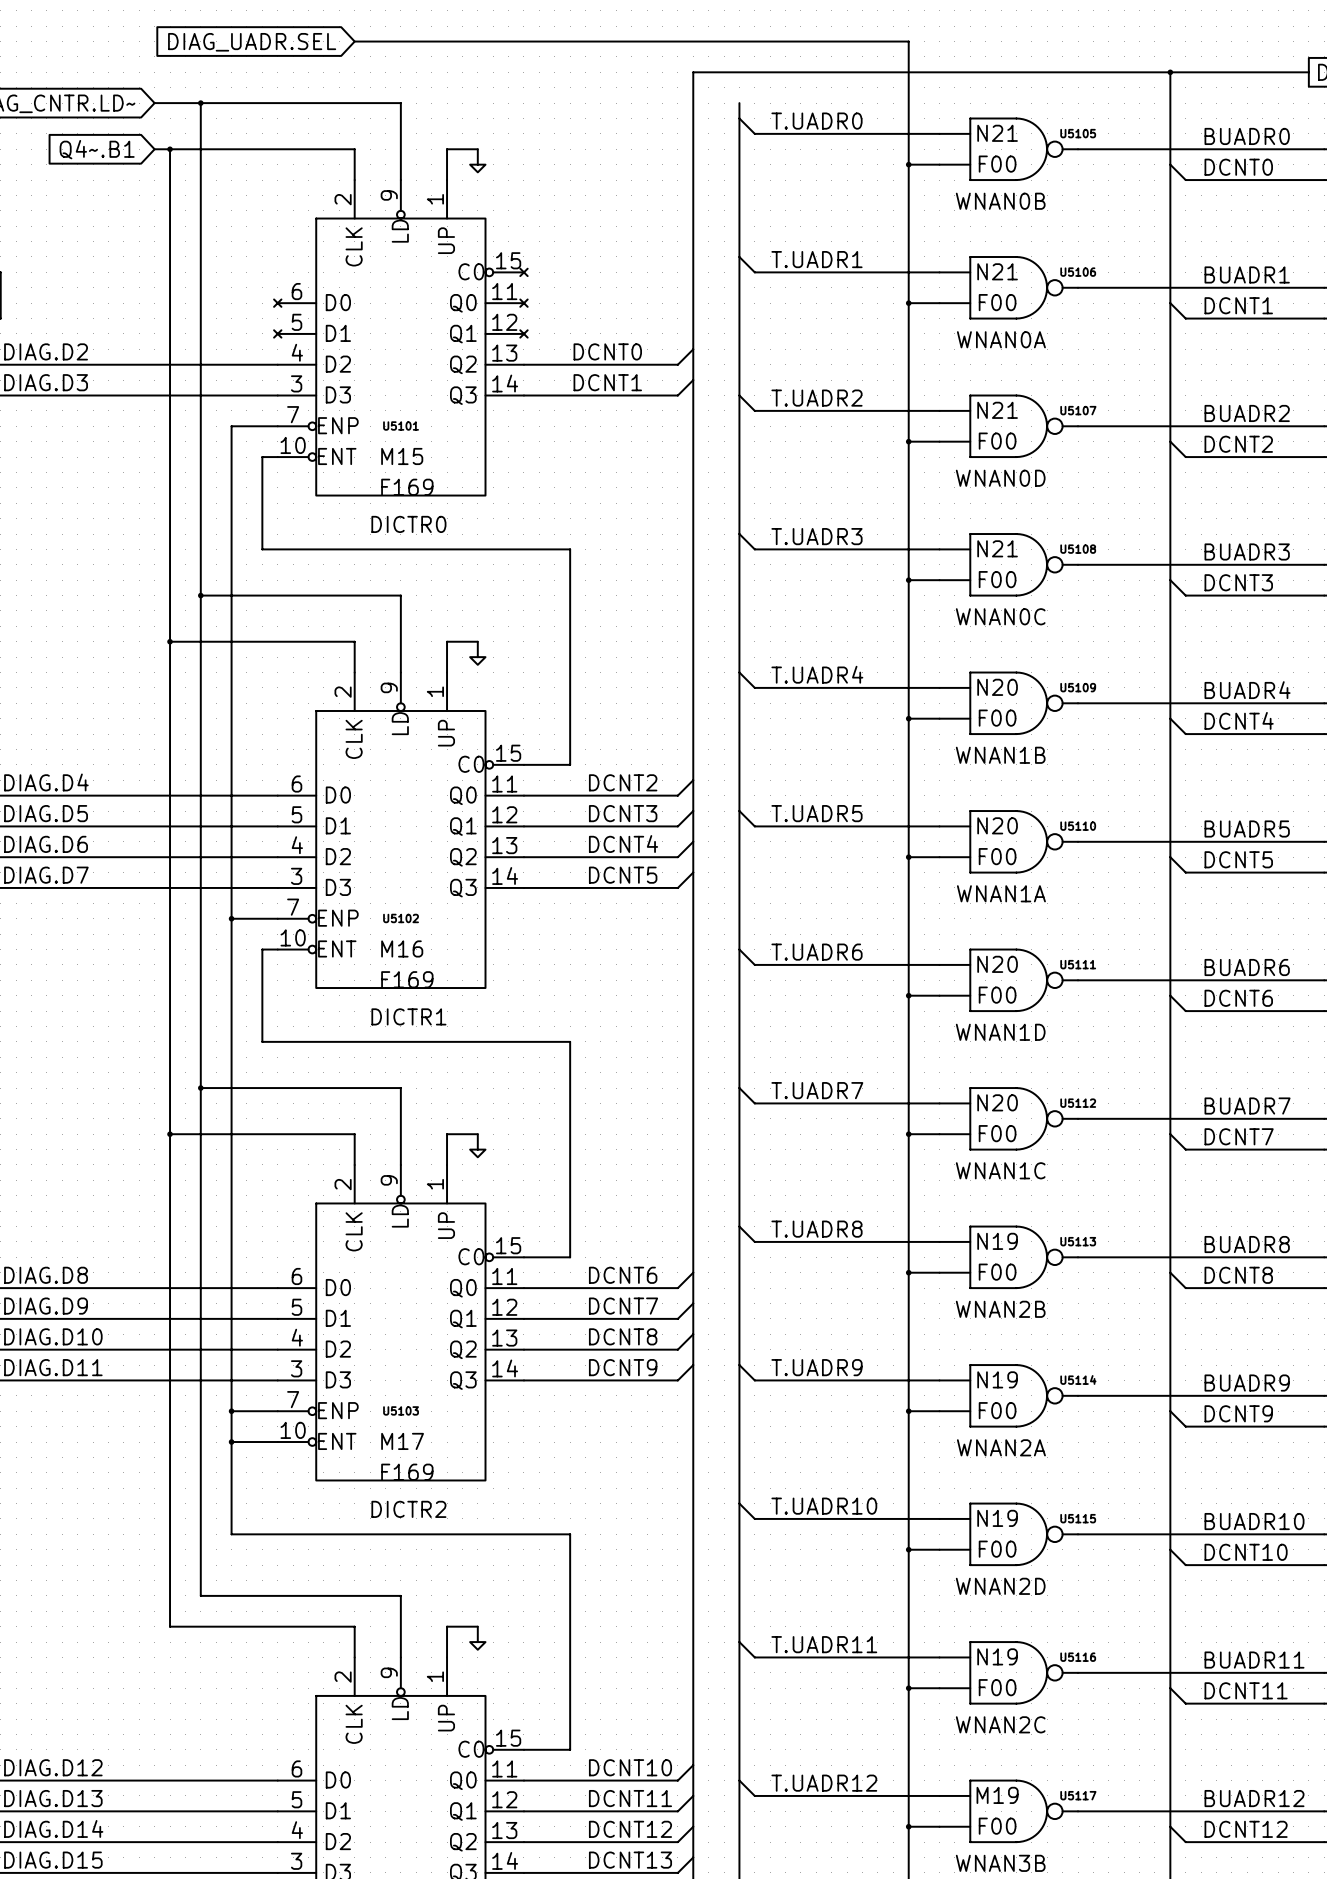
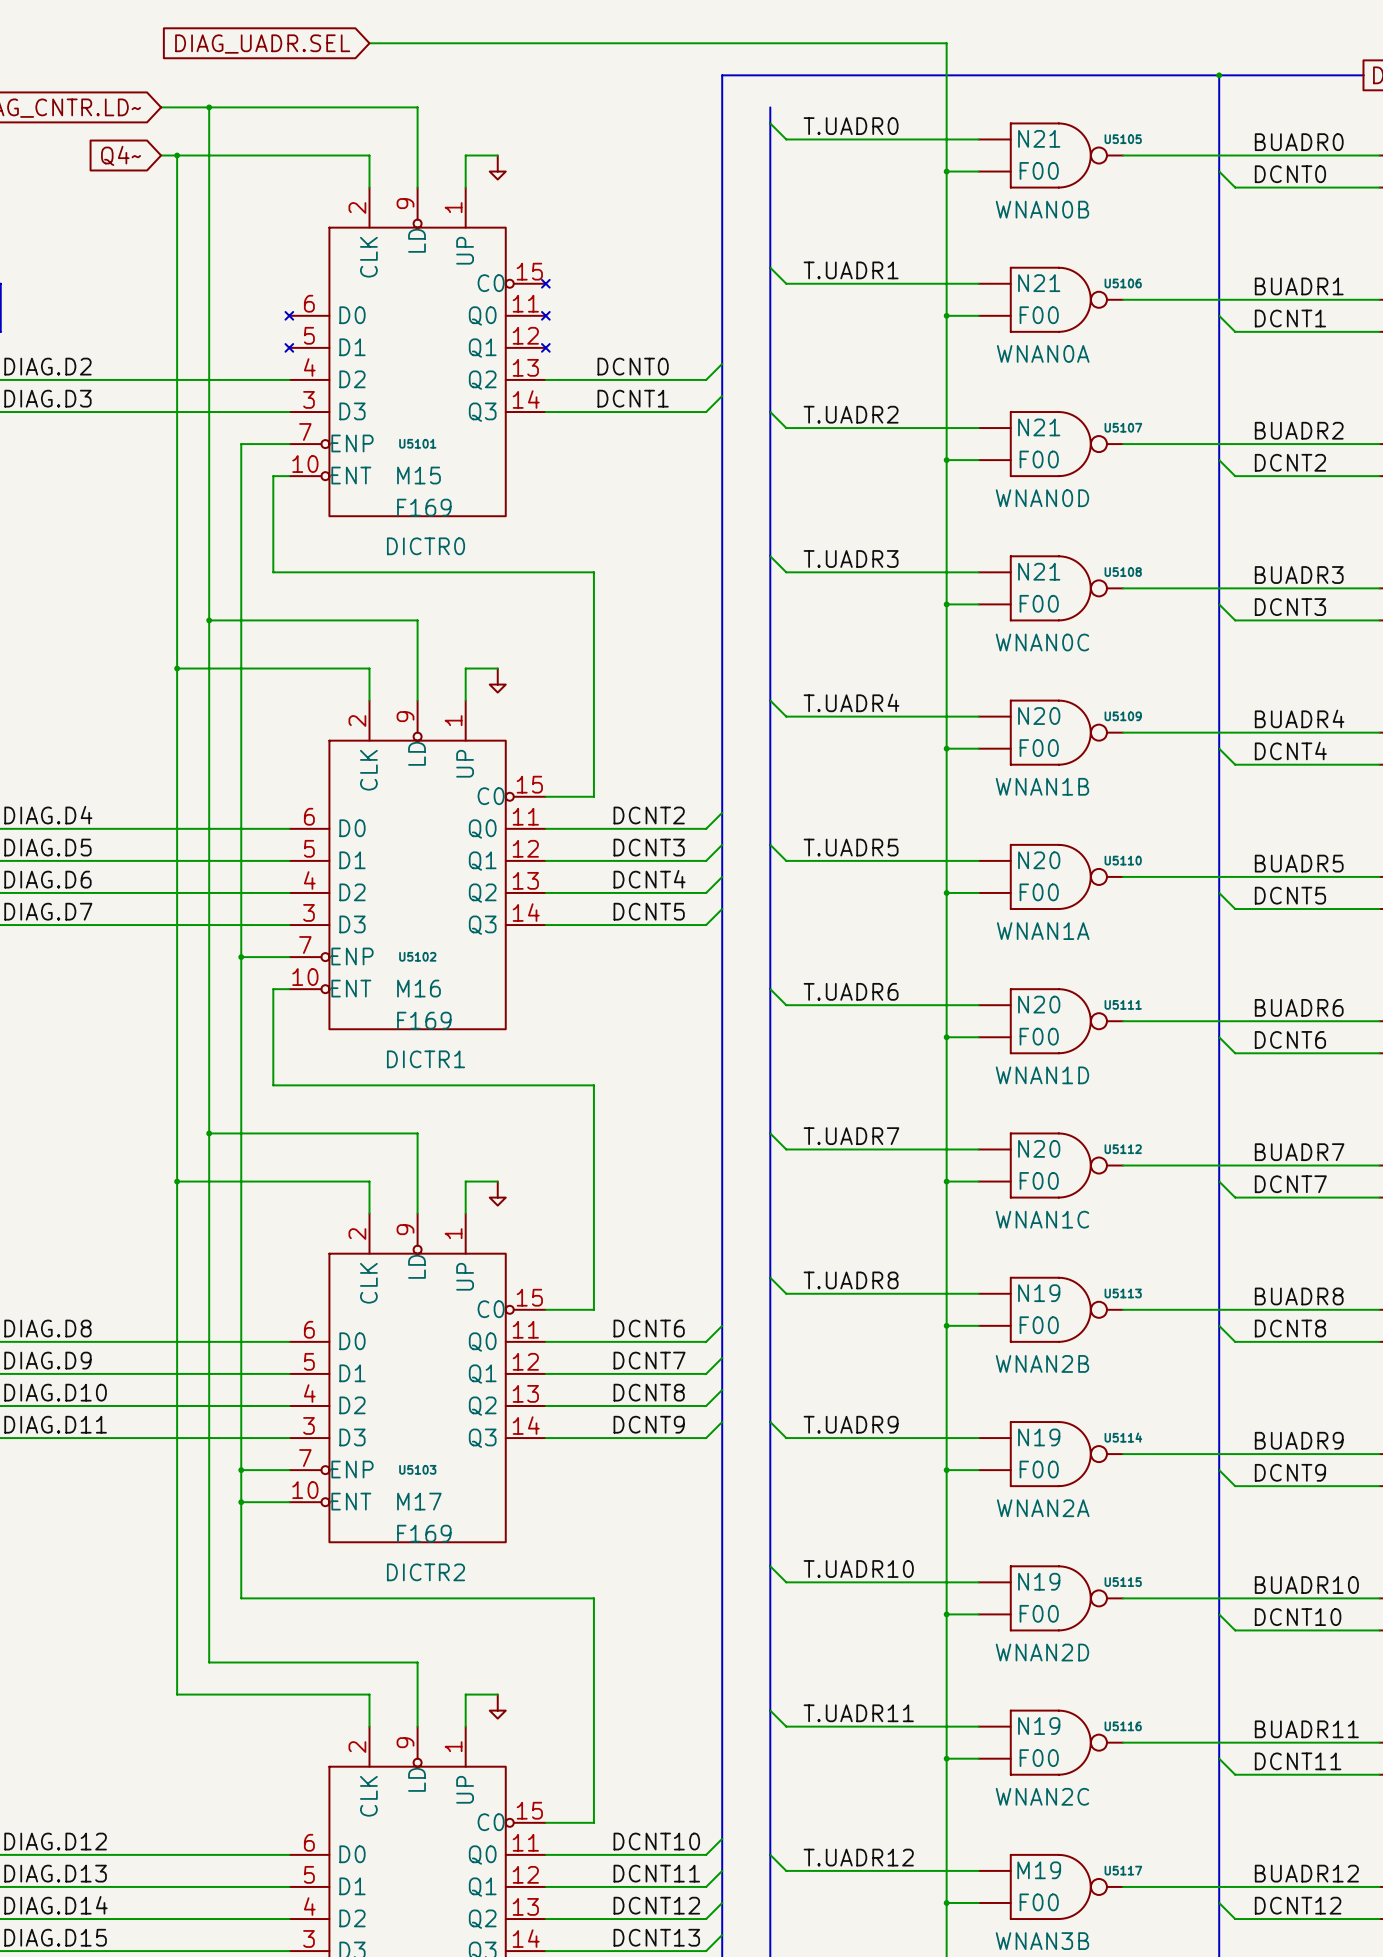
global label: Q4~.B1 (97, 149) -> Q4~ (121, 155)

